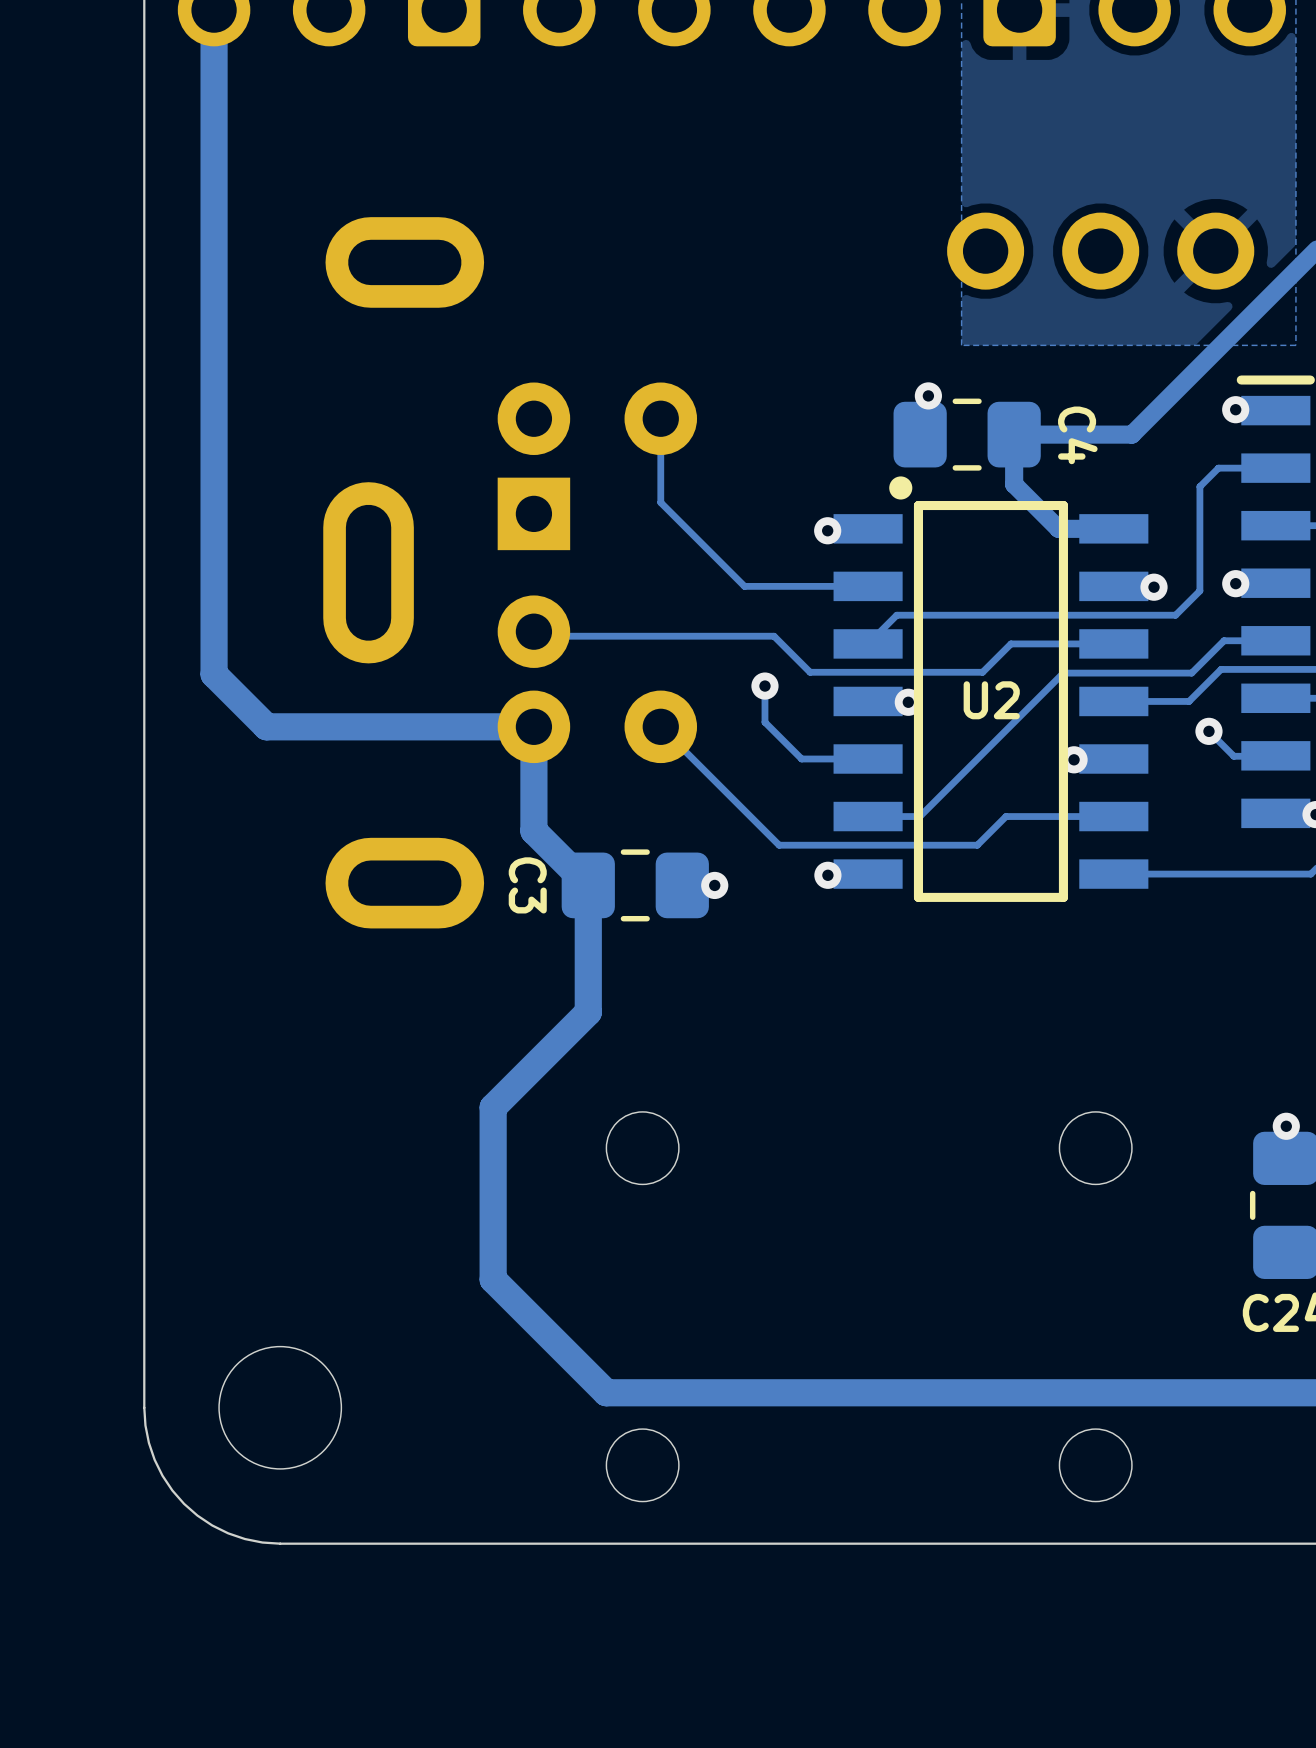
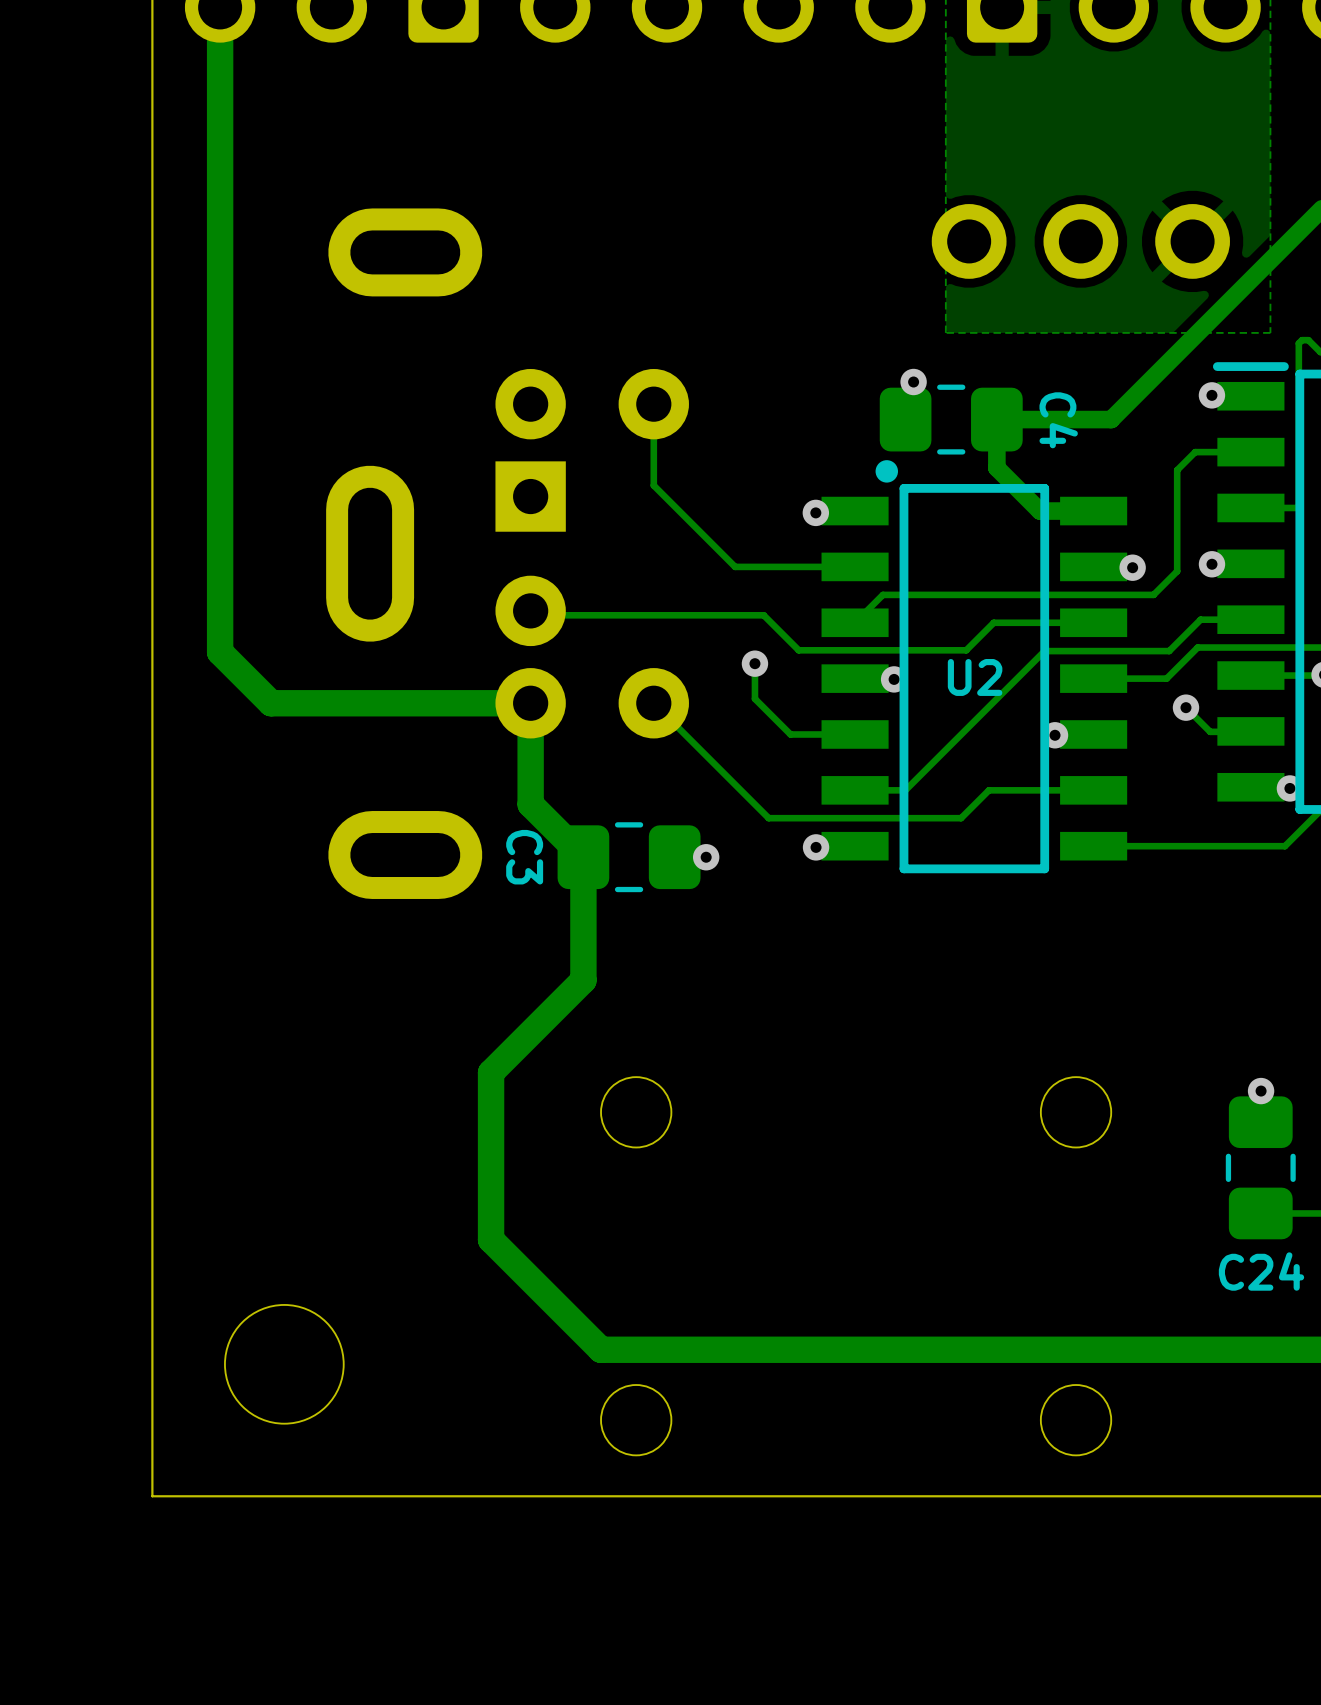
board edge: (144, 1407) (148, 1442) (154, 1459) (172, 1490) (184, 1503) (197, 1515) (228, 1533) (262, 1542) (280, 1543) -> (152, 1364) (152, 1496) (284, 1496)

